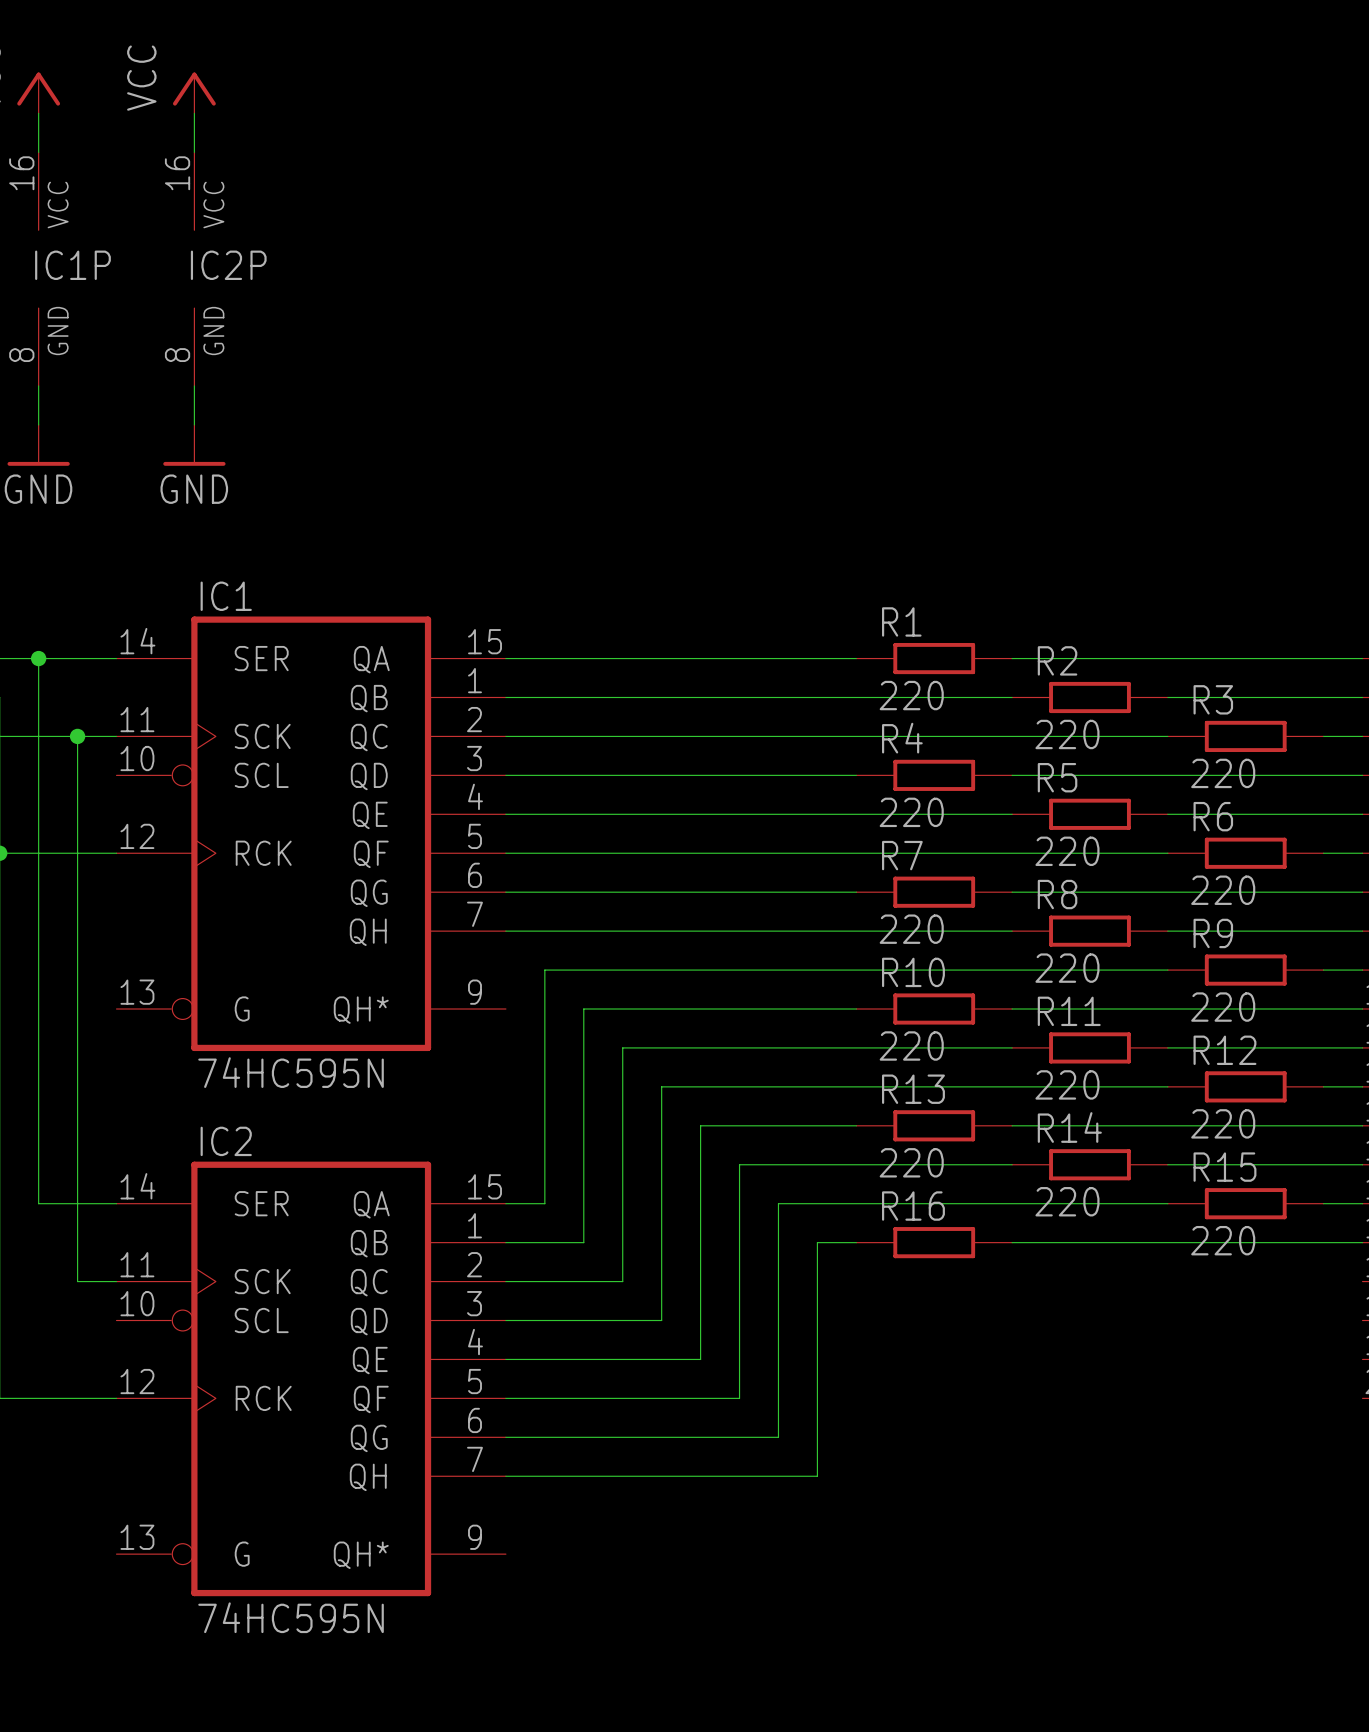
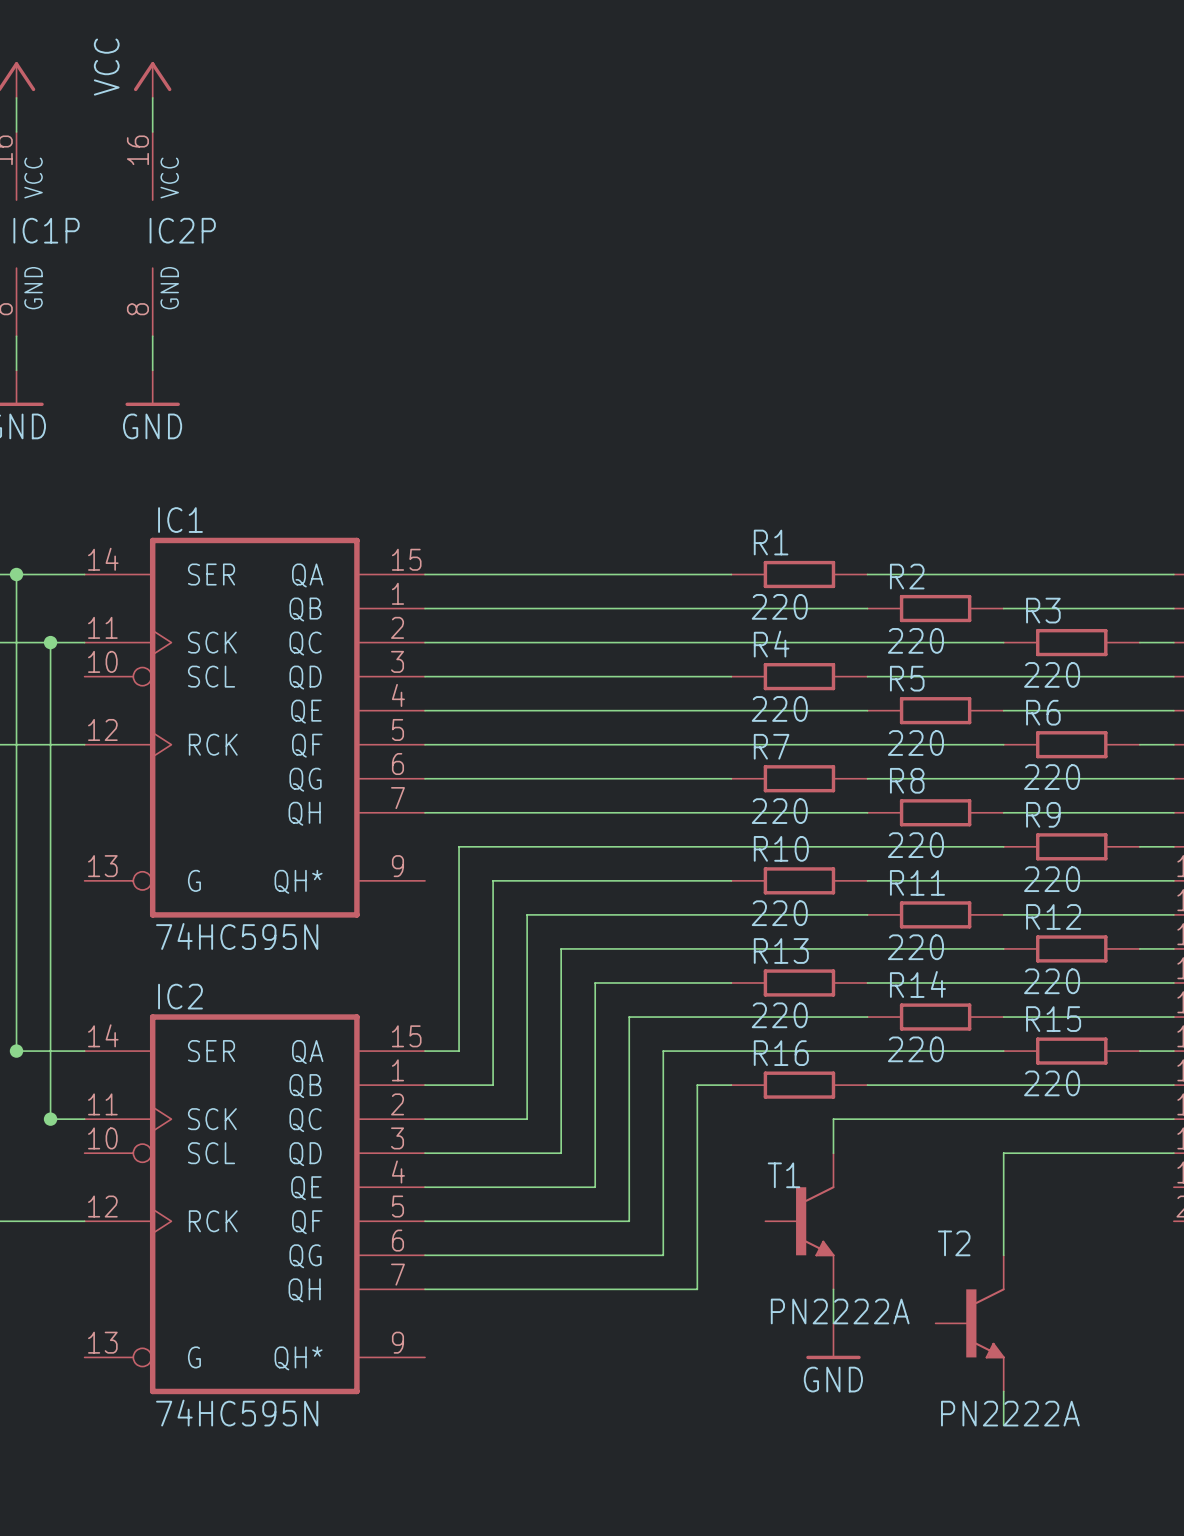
junction: none -> (16, 1051)
junction: none -> (50, 1119)
wire: none -> (1173, 1119) (833, 1119) (833, 1153)
wire: none -> (1173, 1153) (1003, 1153) (1003, 1255)
T1: none -> PN2222A (799, 1221)
wire: none -> (833, 1289) (833, 1323)
T2: none -> PN2222A (970, 1323)
power symbol: none -> GND (833, 1341)
wire: none -> (1003, 1391) (1003, 1425)

